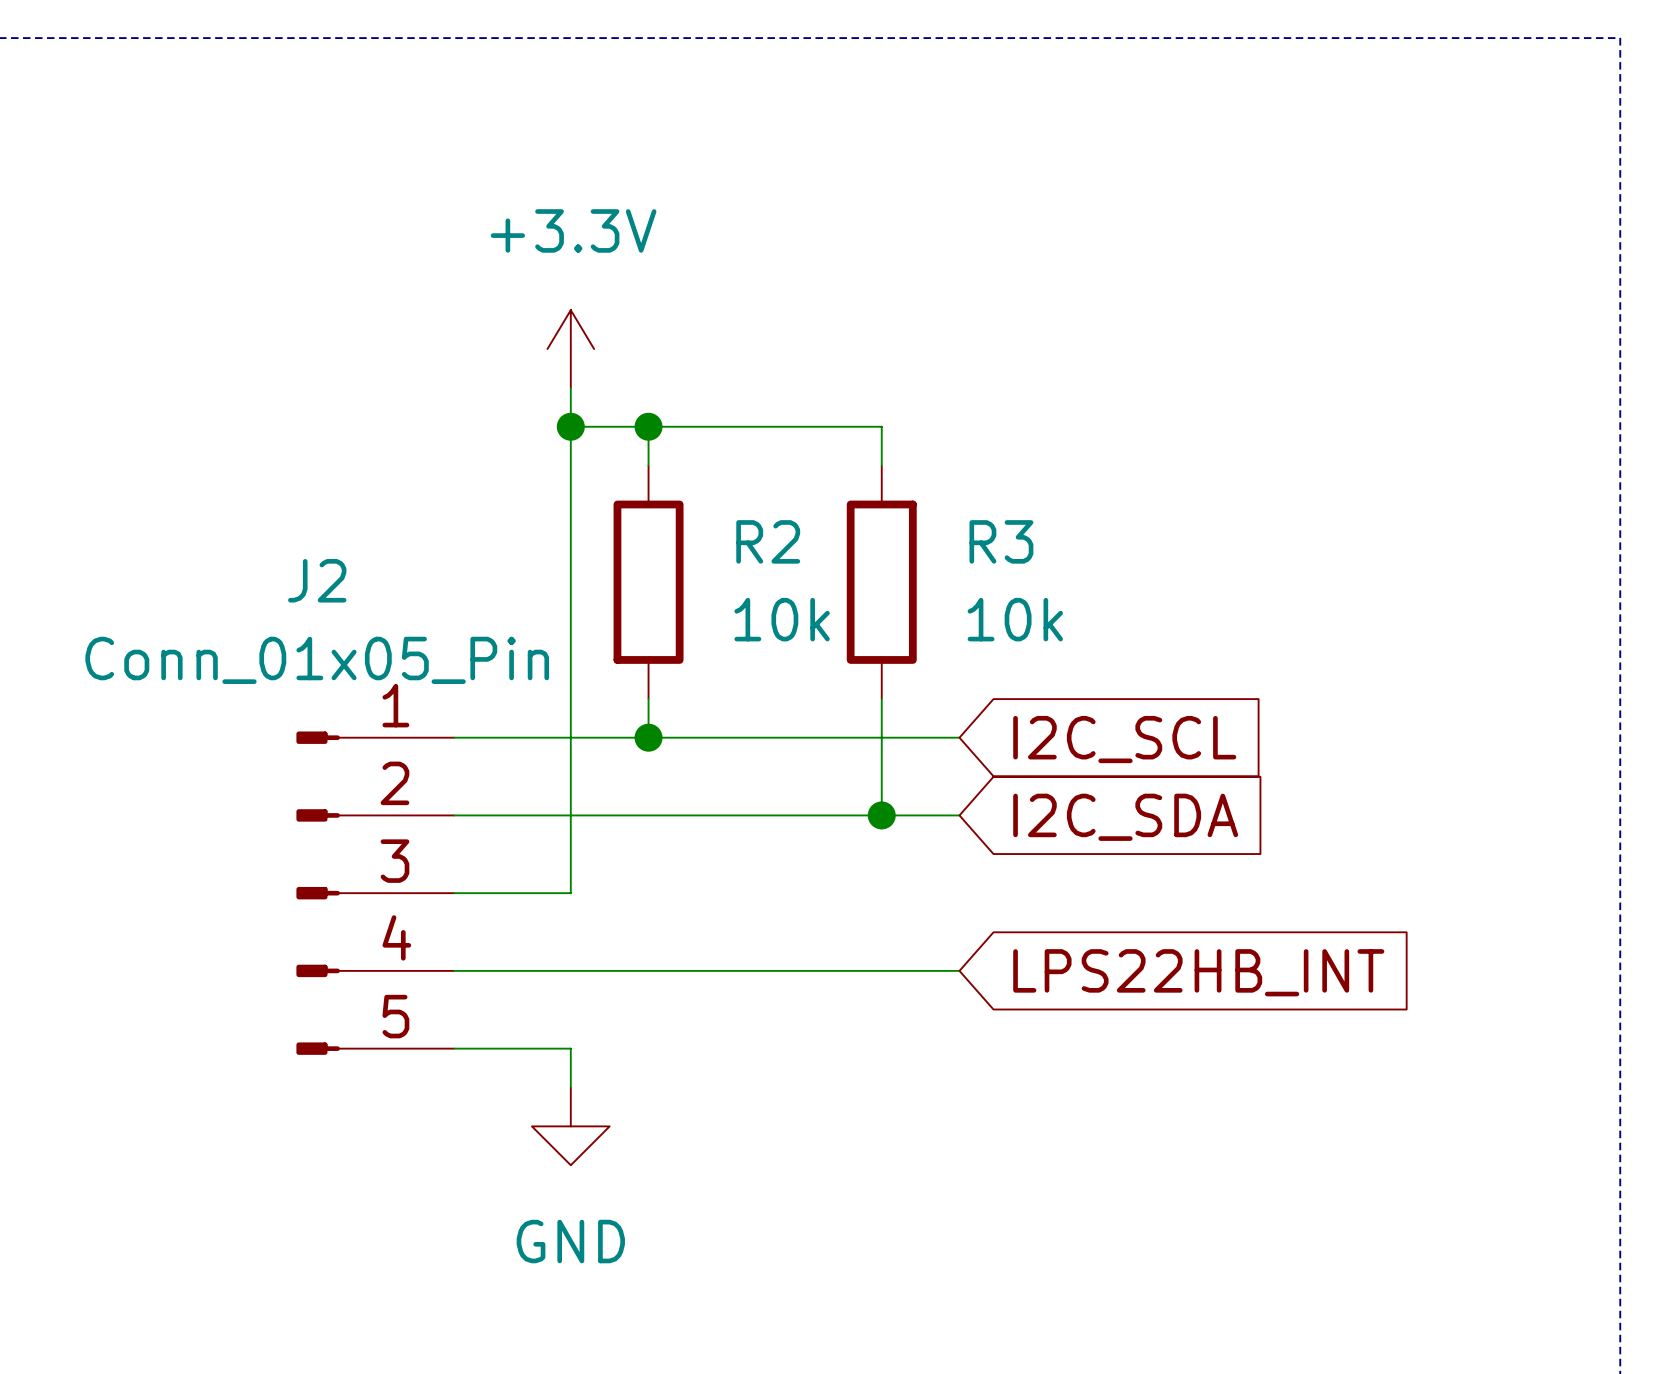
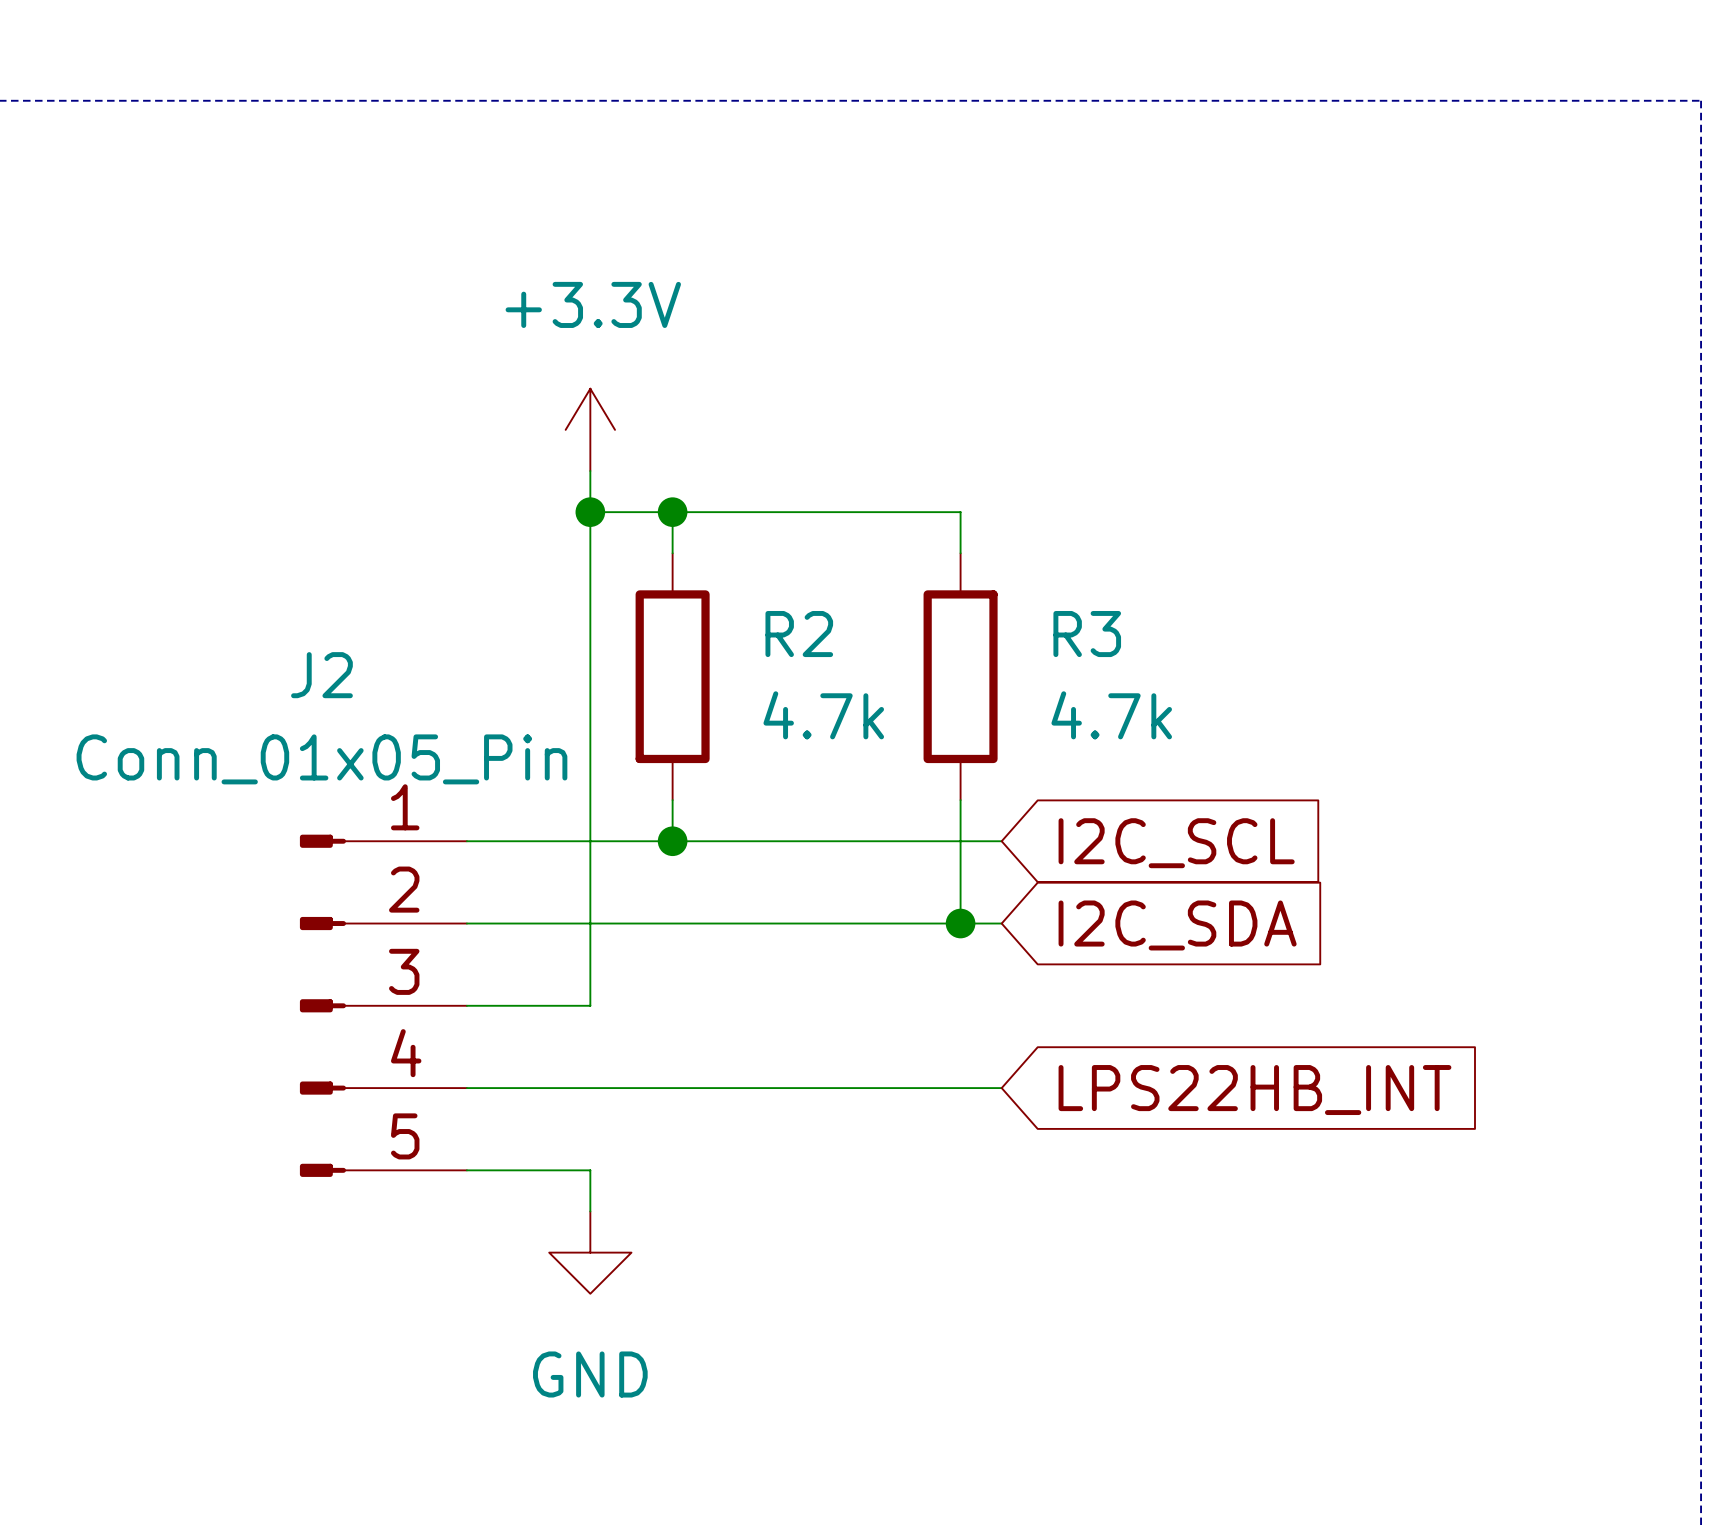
wire: (881, 426) (881, 465) -> (919, 512) (960, 512) (960, 553)
R3 position: (881, 582) -> (960, 676)
R2 value: 10k (782, 619) -> 4.7k (823, 715)
R3 value: 10k (1015, 619) -> 4.7k (1111, 715)
wire: (881, 698) (881, 815) -> (960, 800) (960, 923)
junction position: (881, 815) -> (960, 923)

